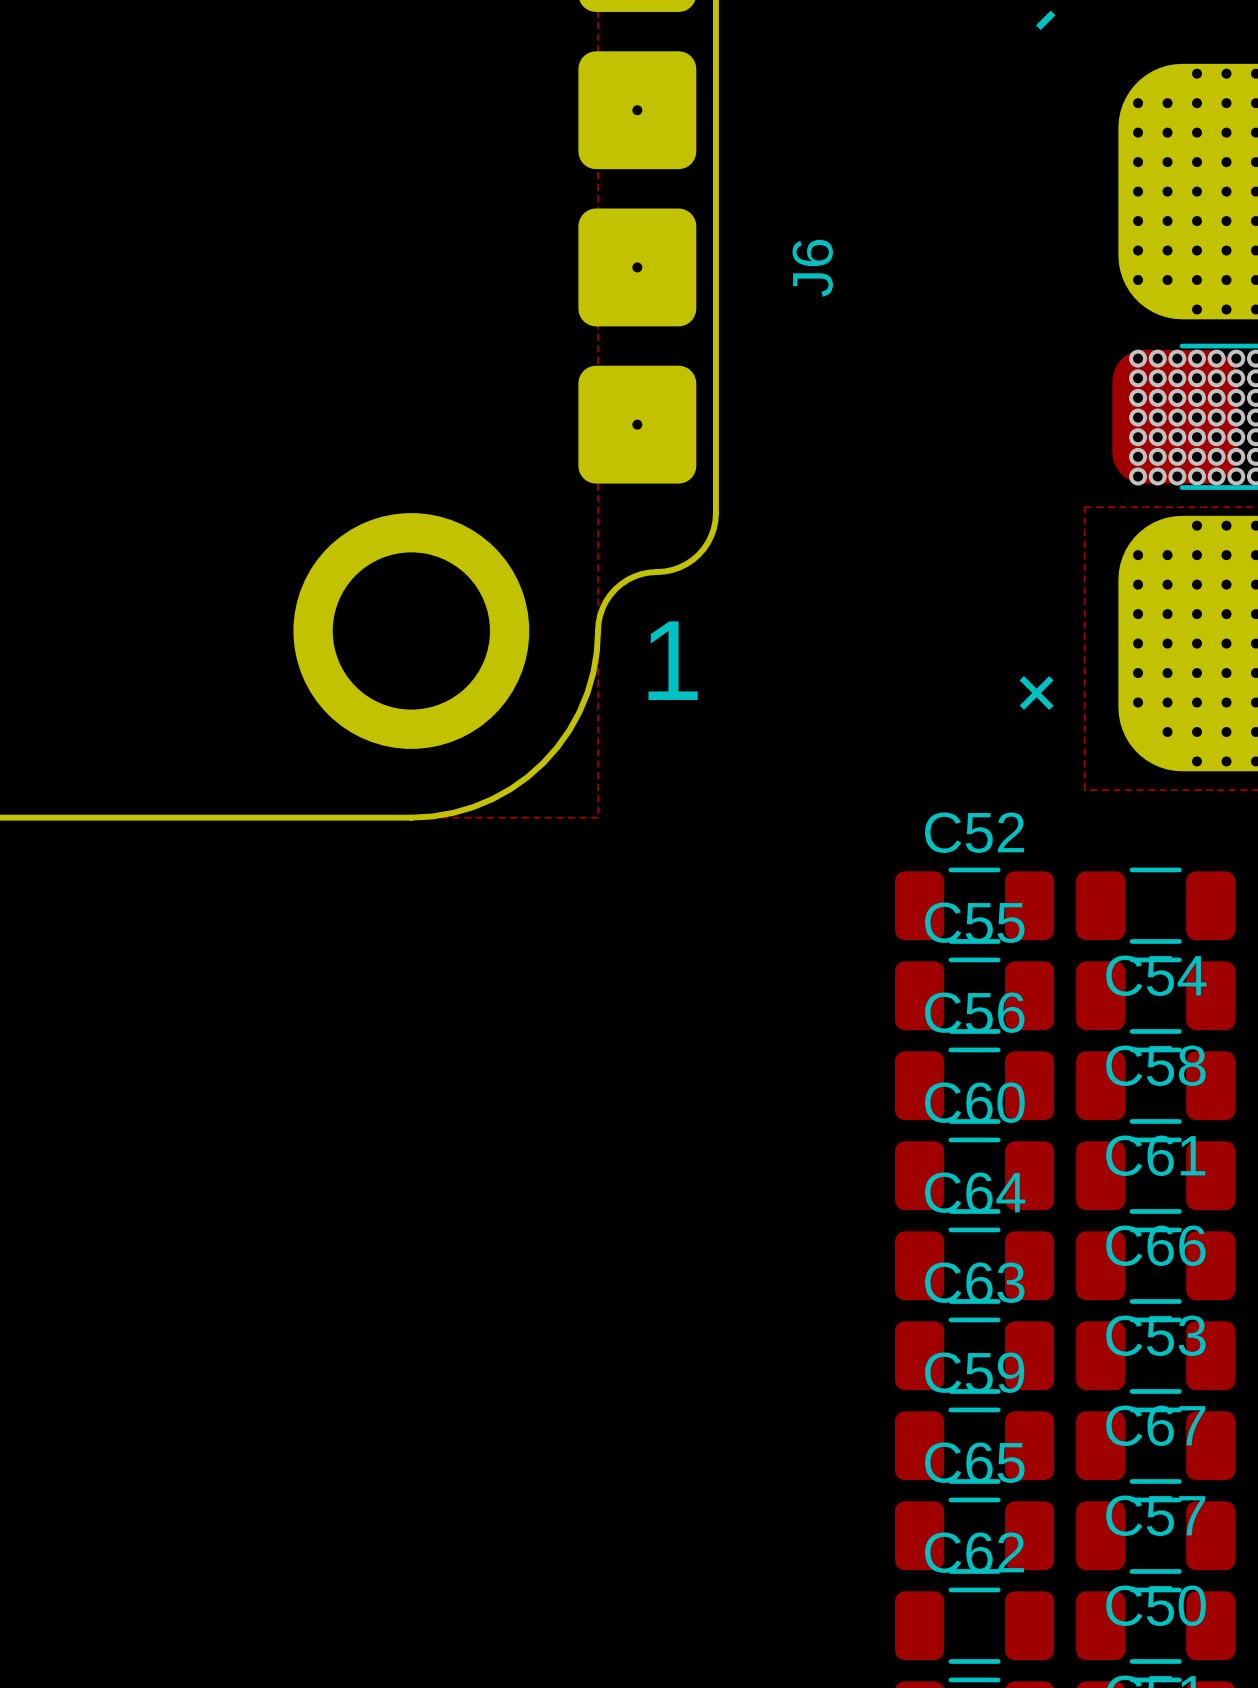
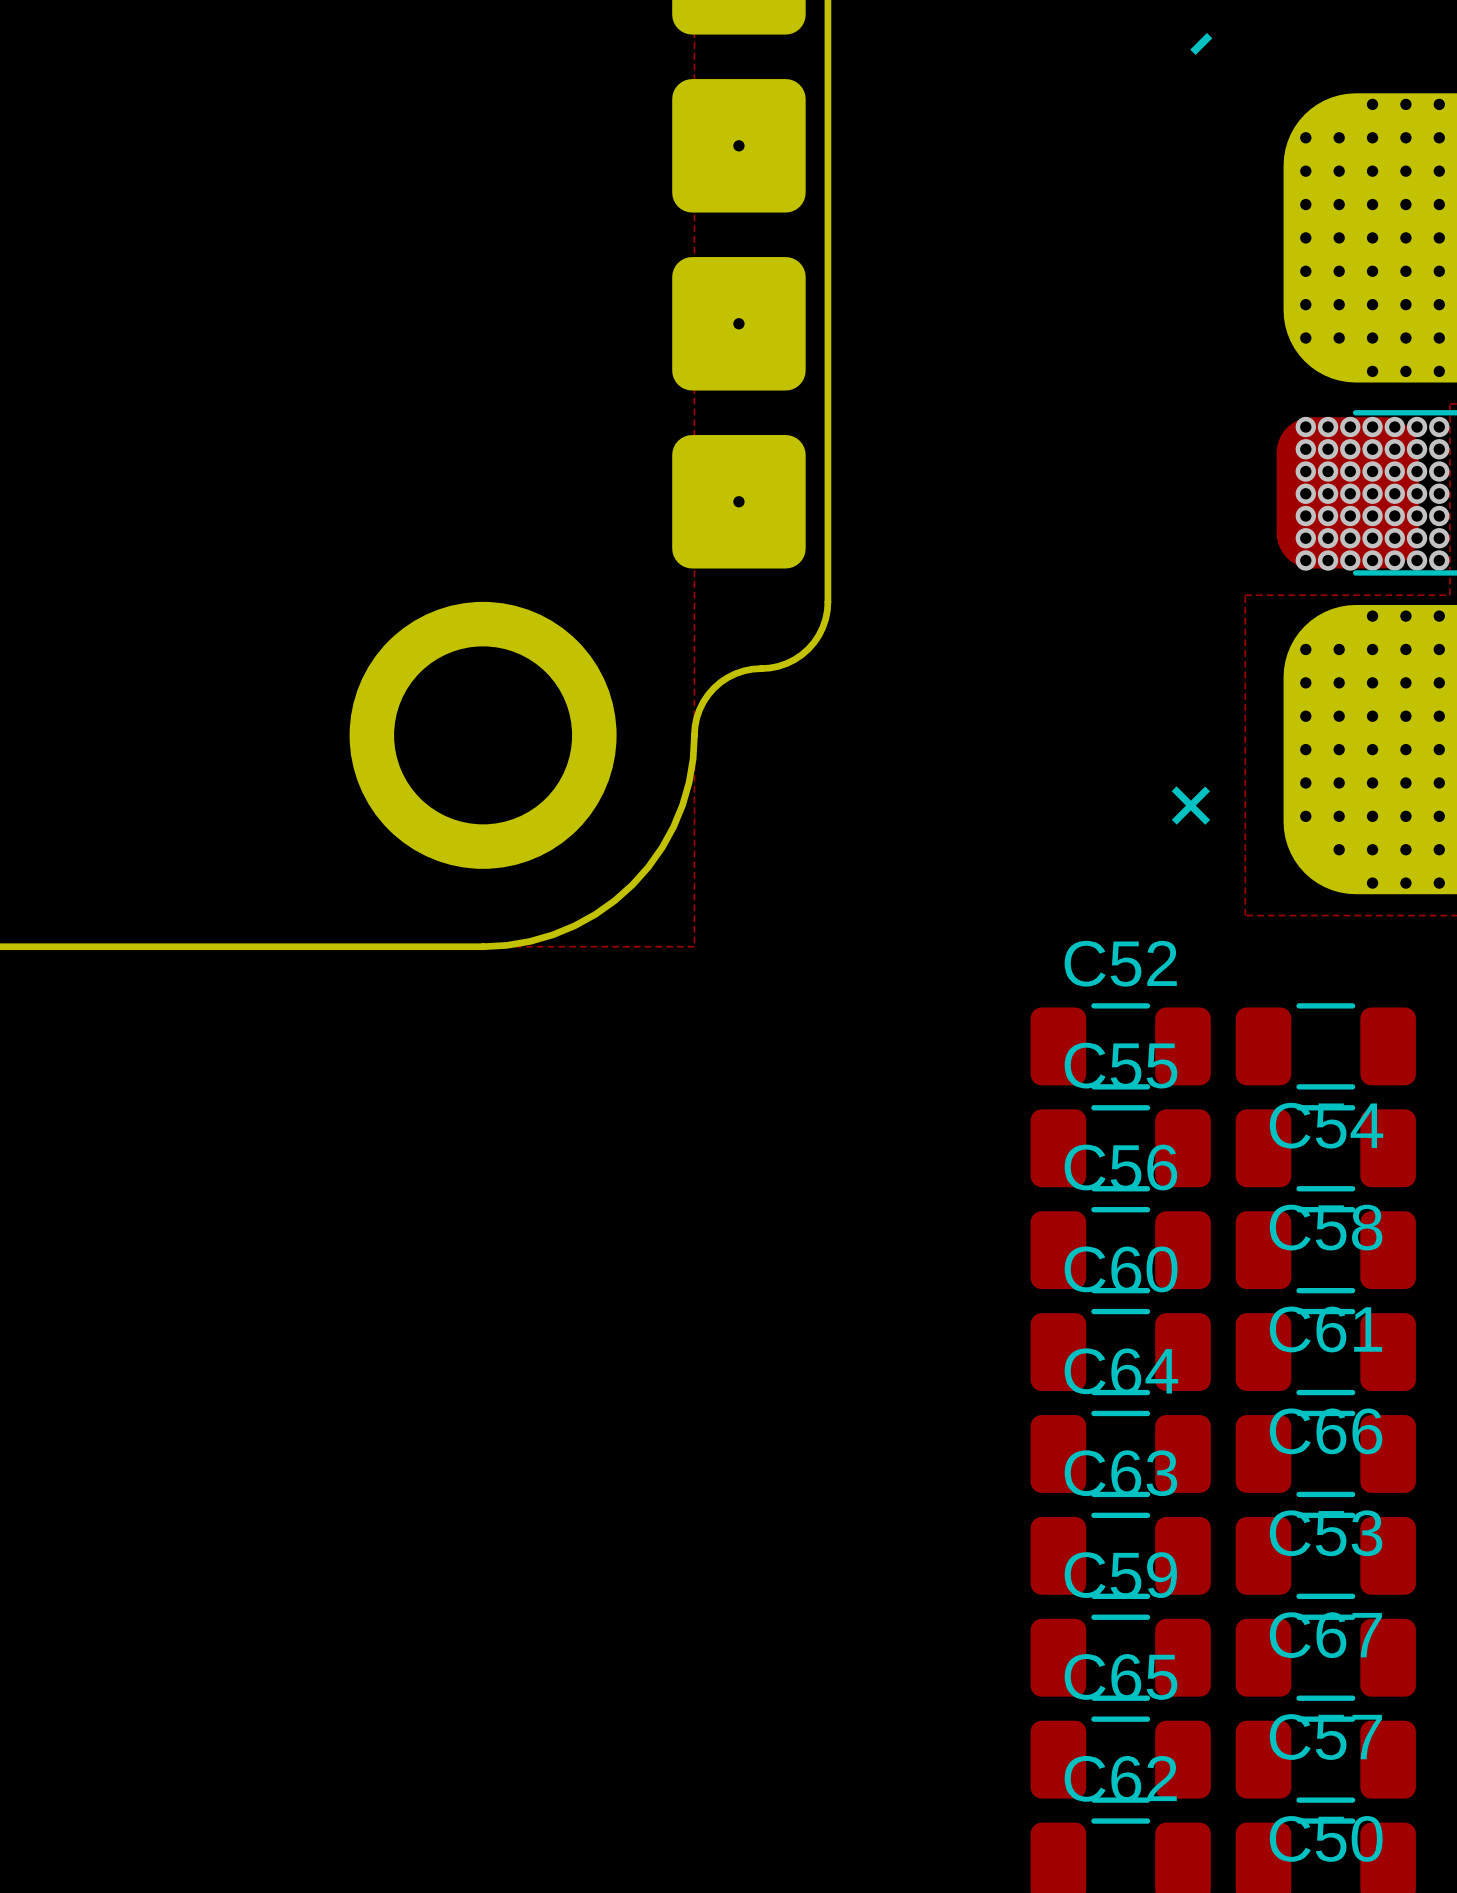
J6 name: J6 (812, 268) -> none
text: 1 (673, 660) -> none

